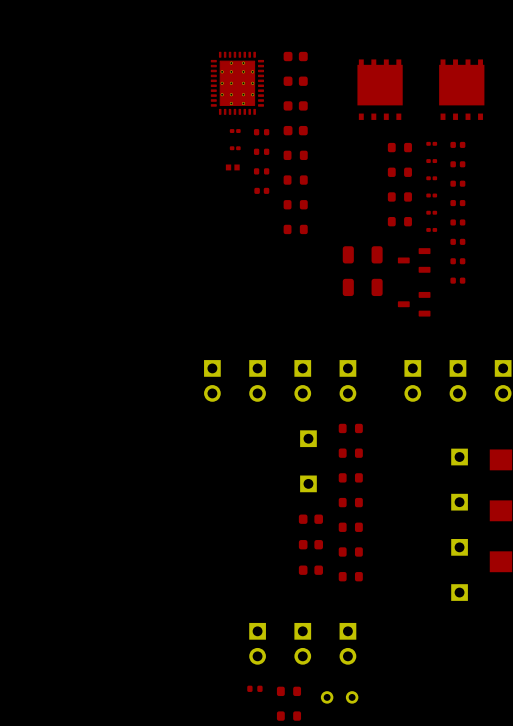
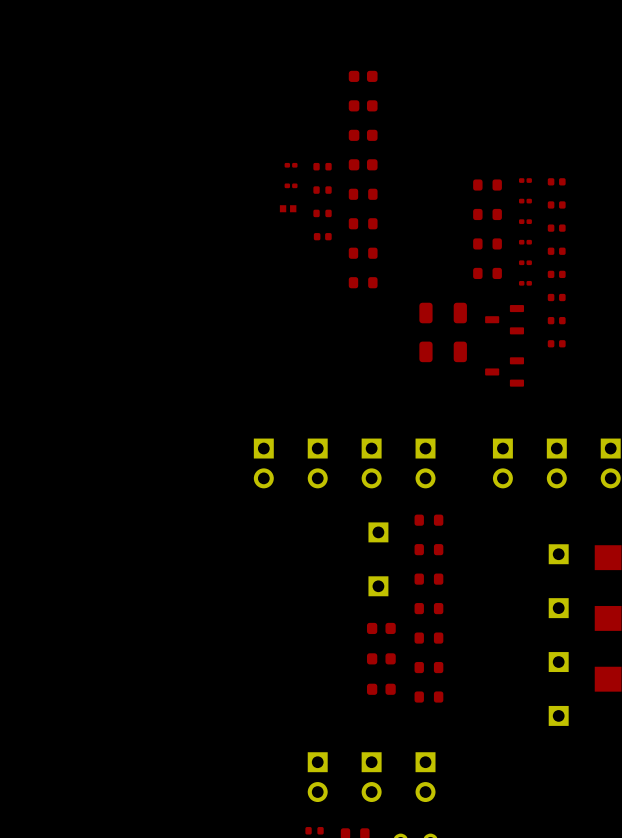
part: (237, 83) -> none
part: (380, 89) -> none
part: (461, 89) -> none

